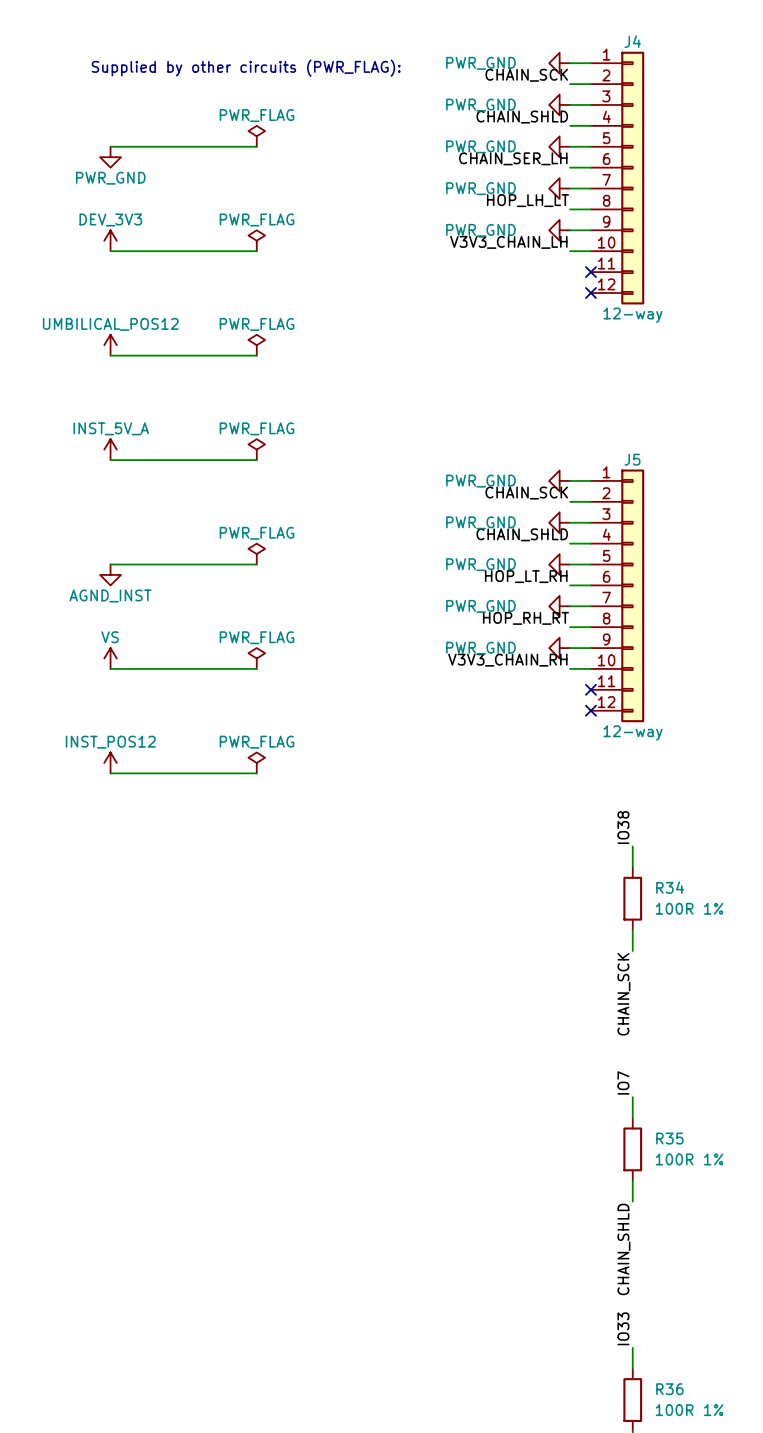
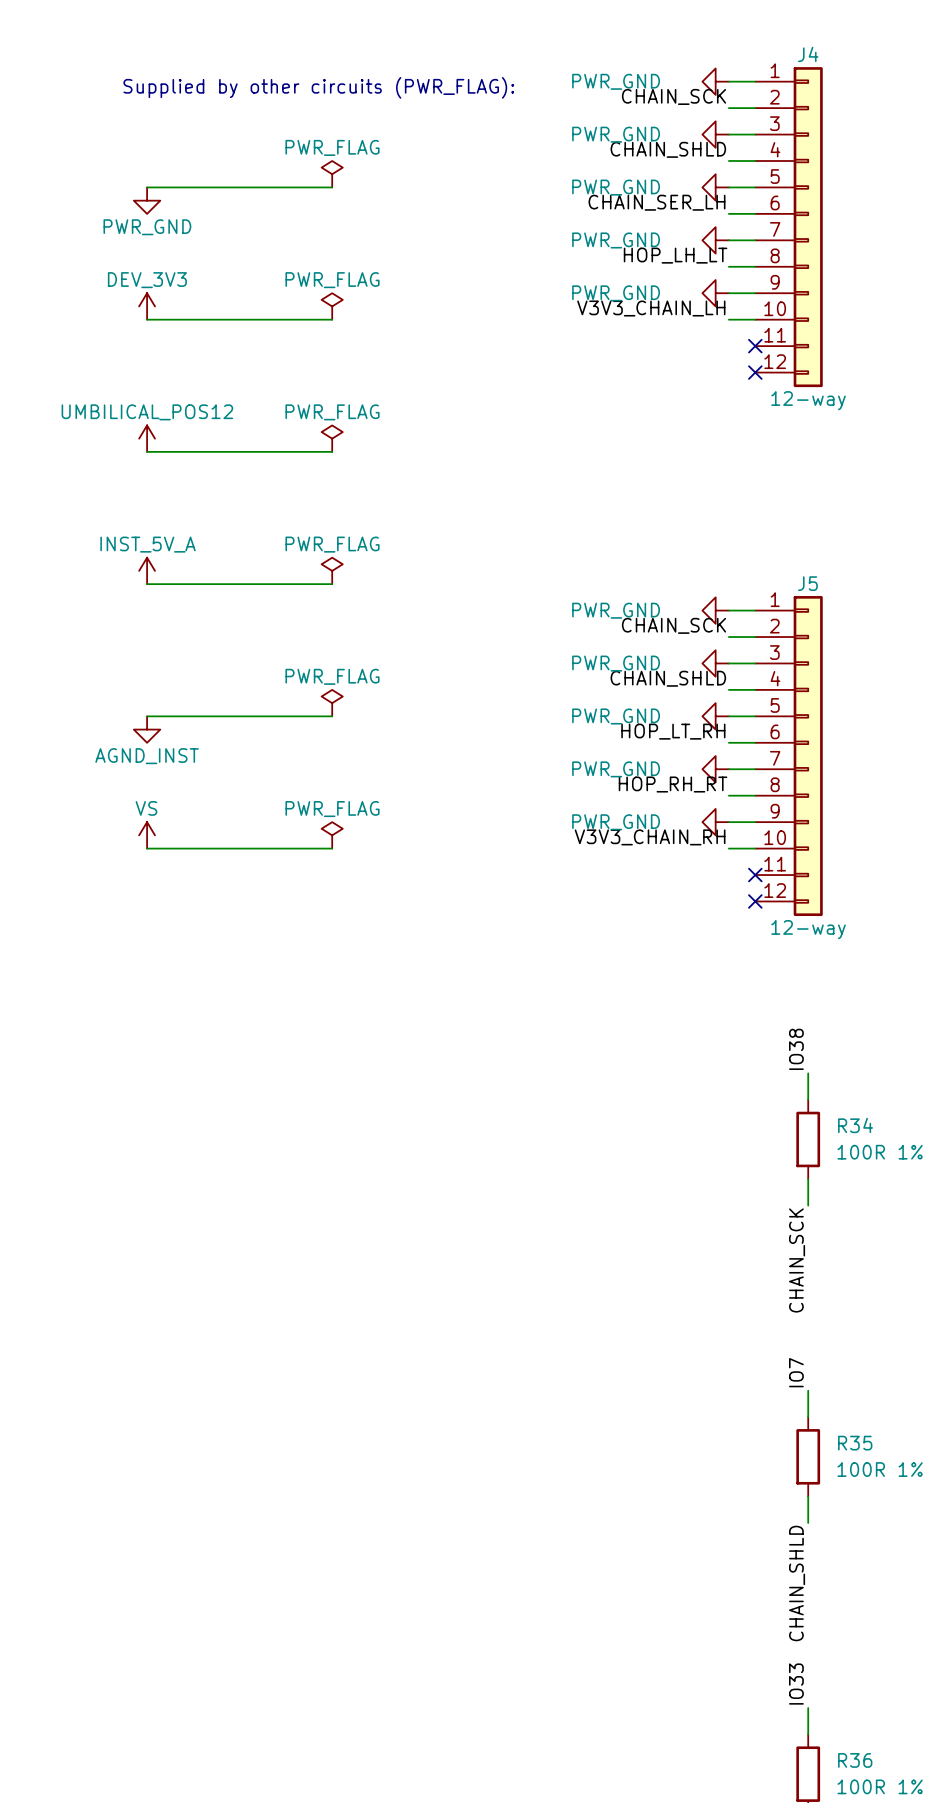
power symbol: INST_POS12 (110, 762) -> none
power symbol: PWR_FLAG (256, 762) -> none
wire: (110, 773) (256, 773) -> none

